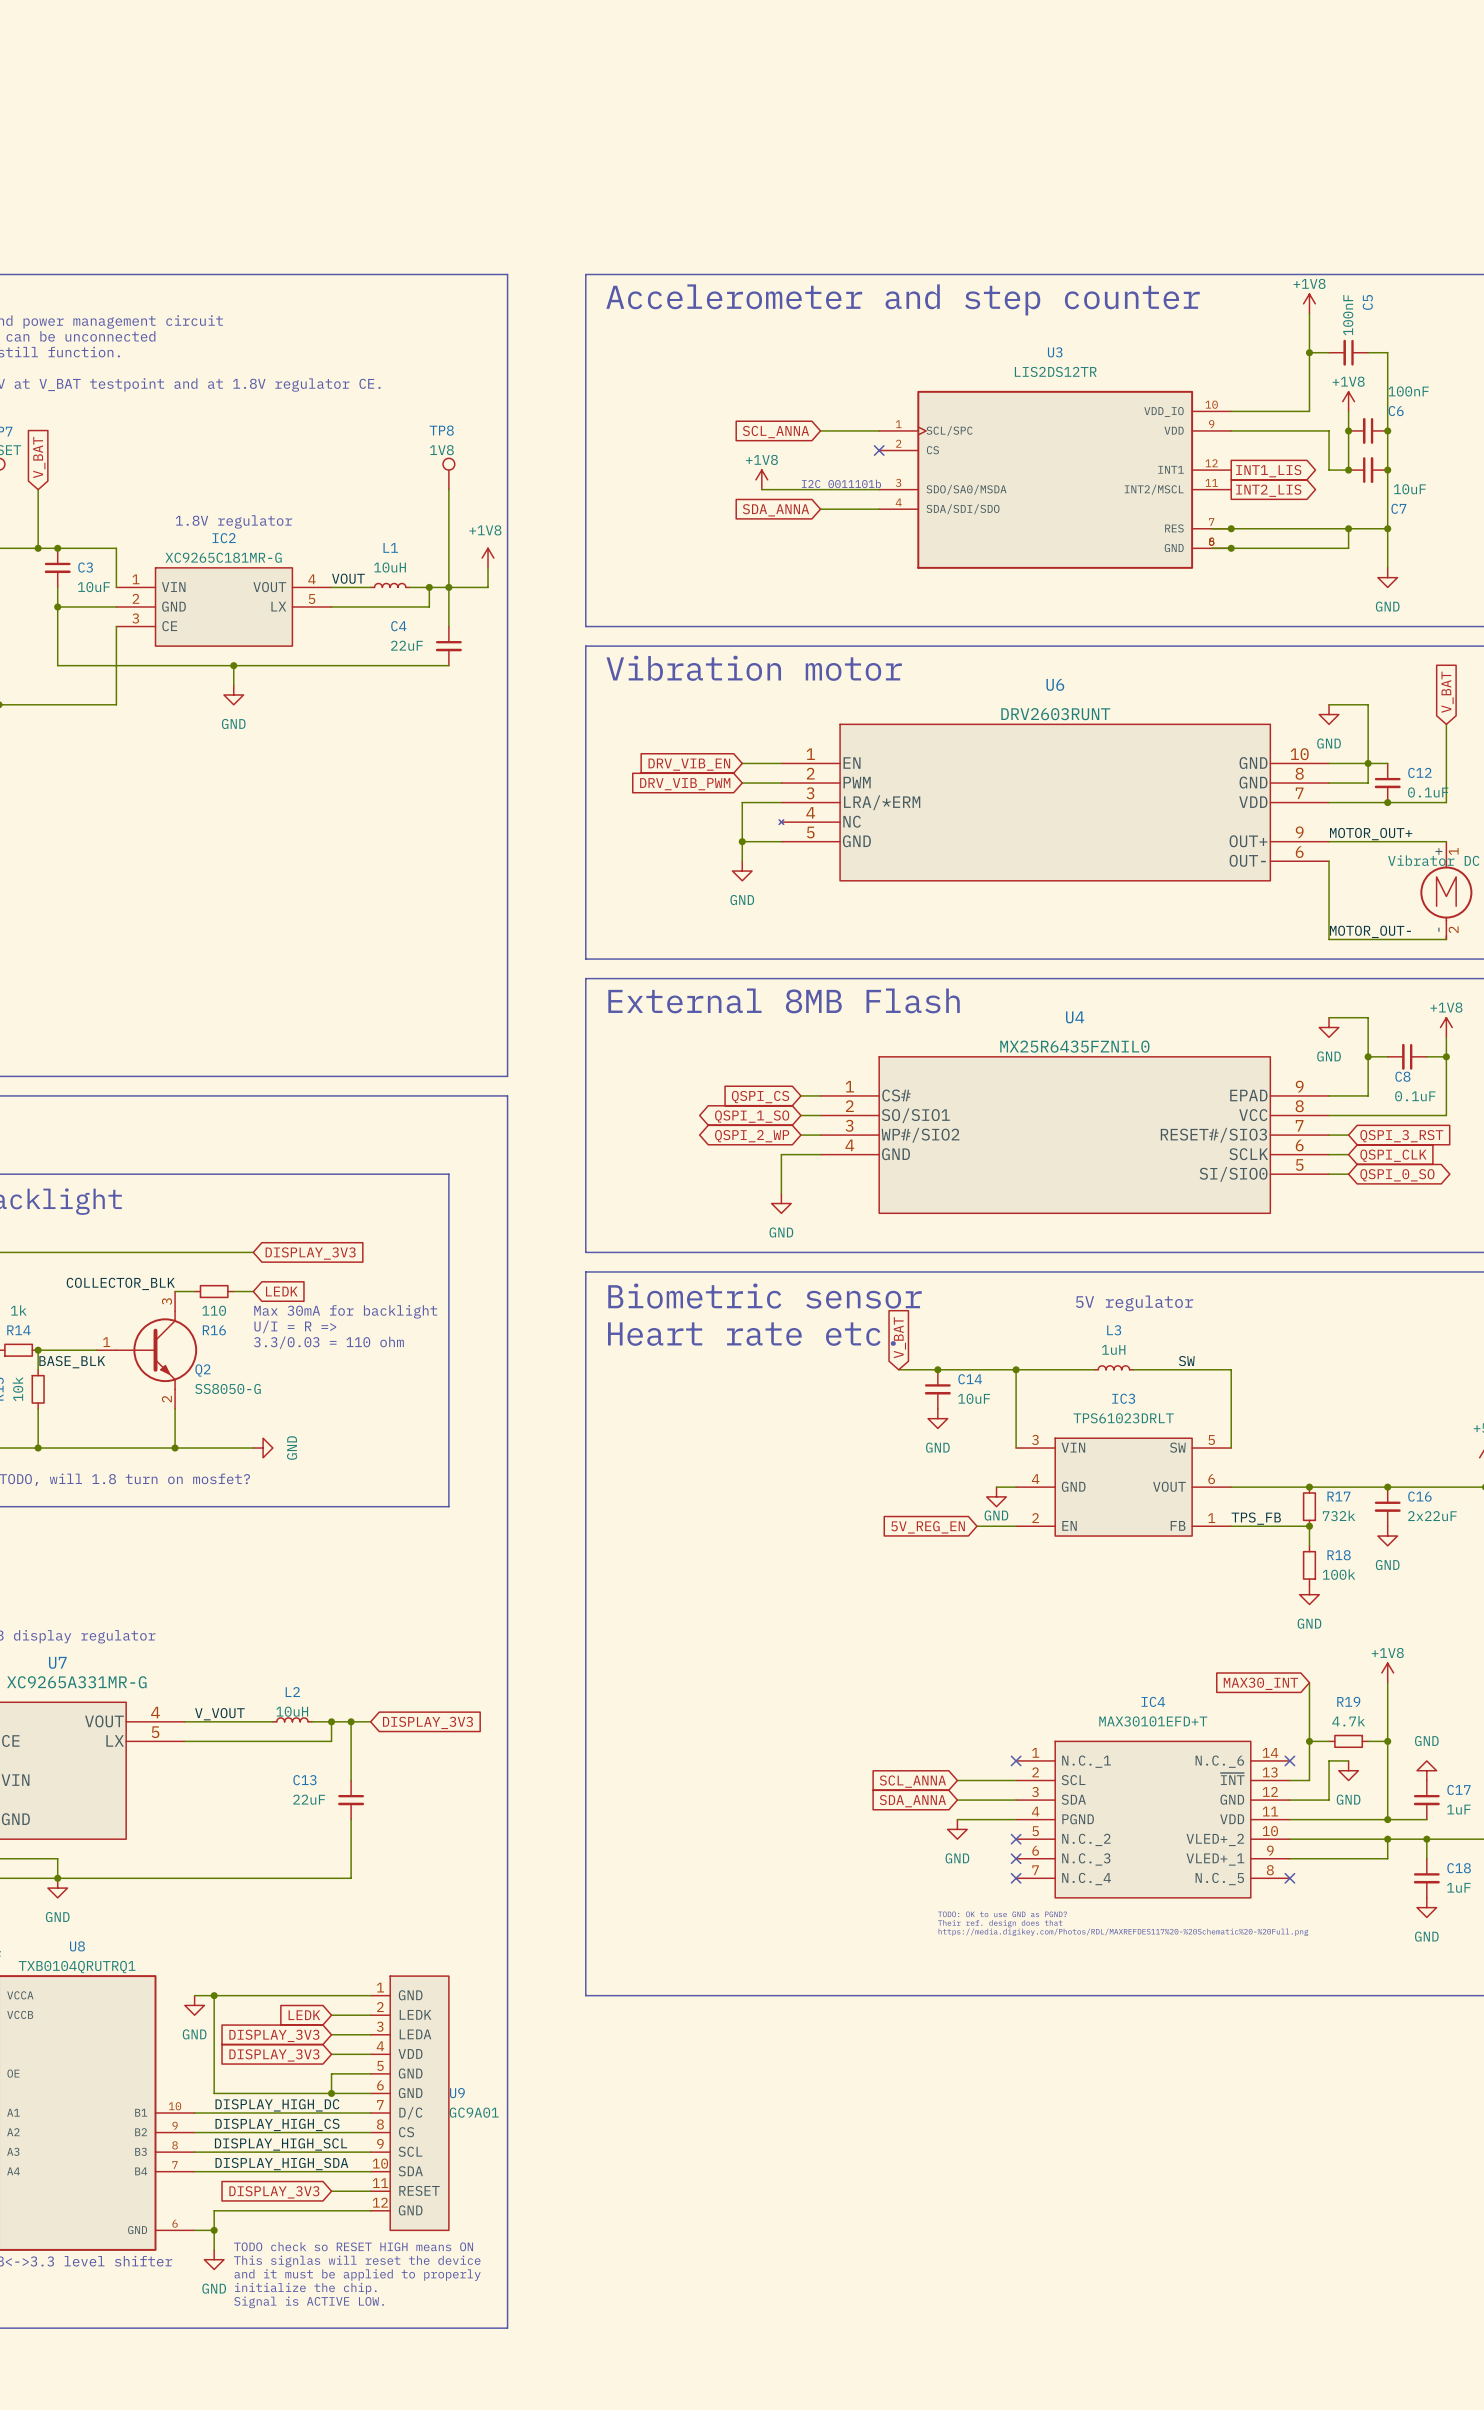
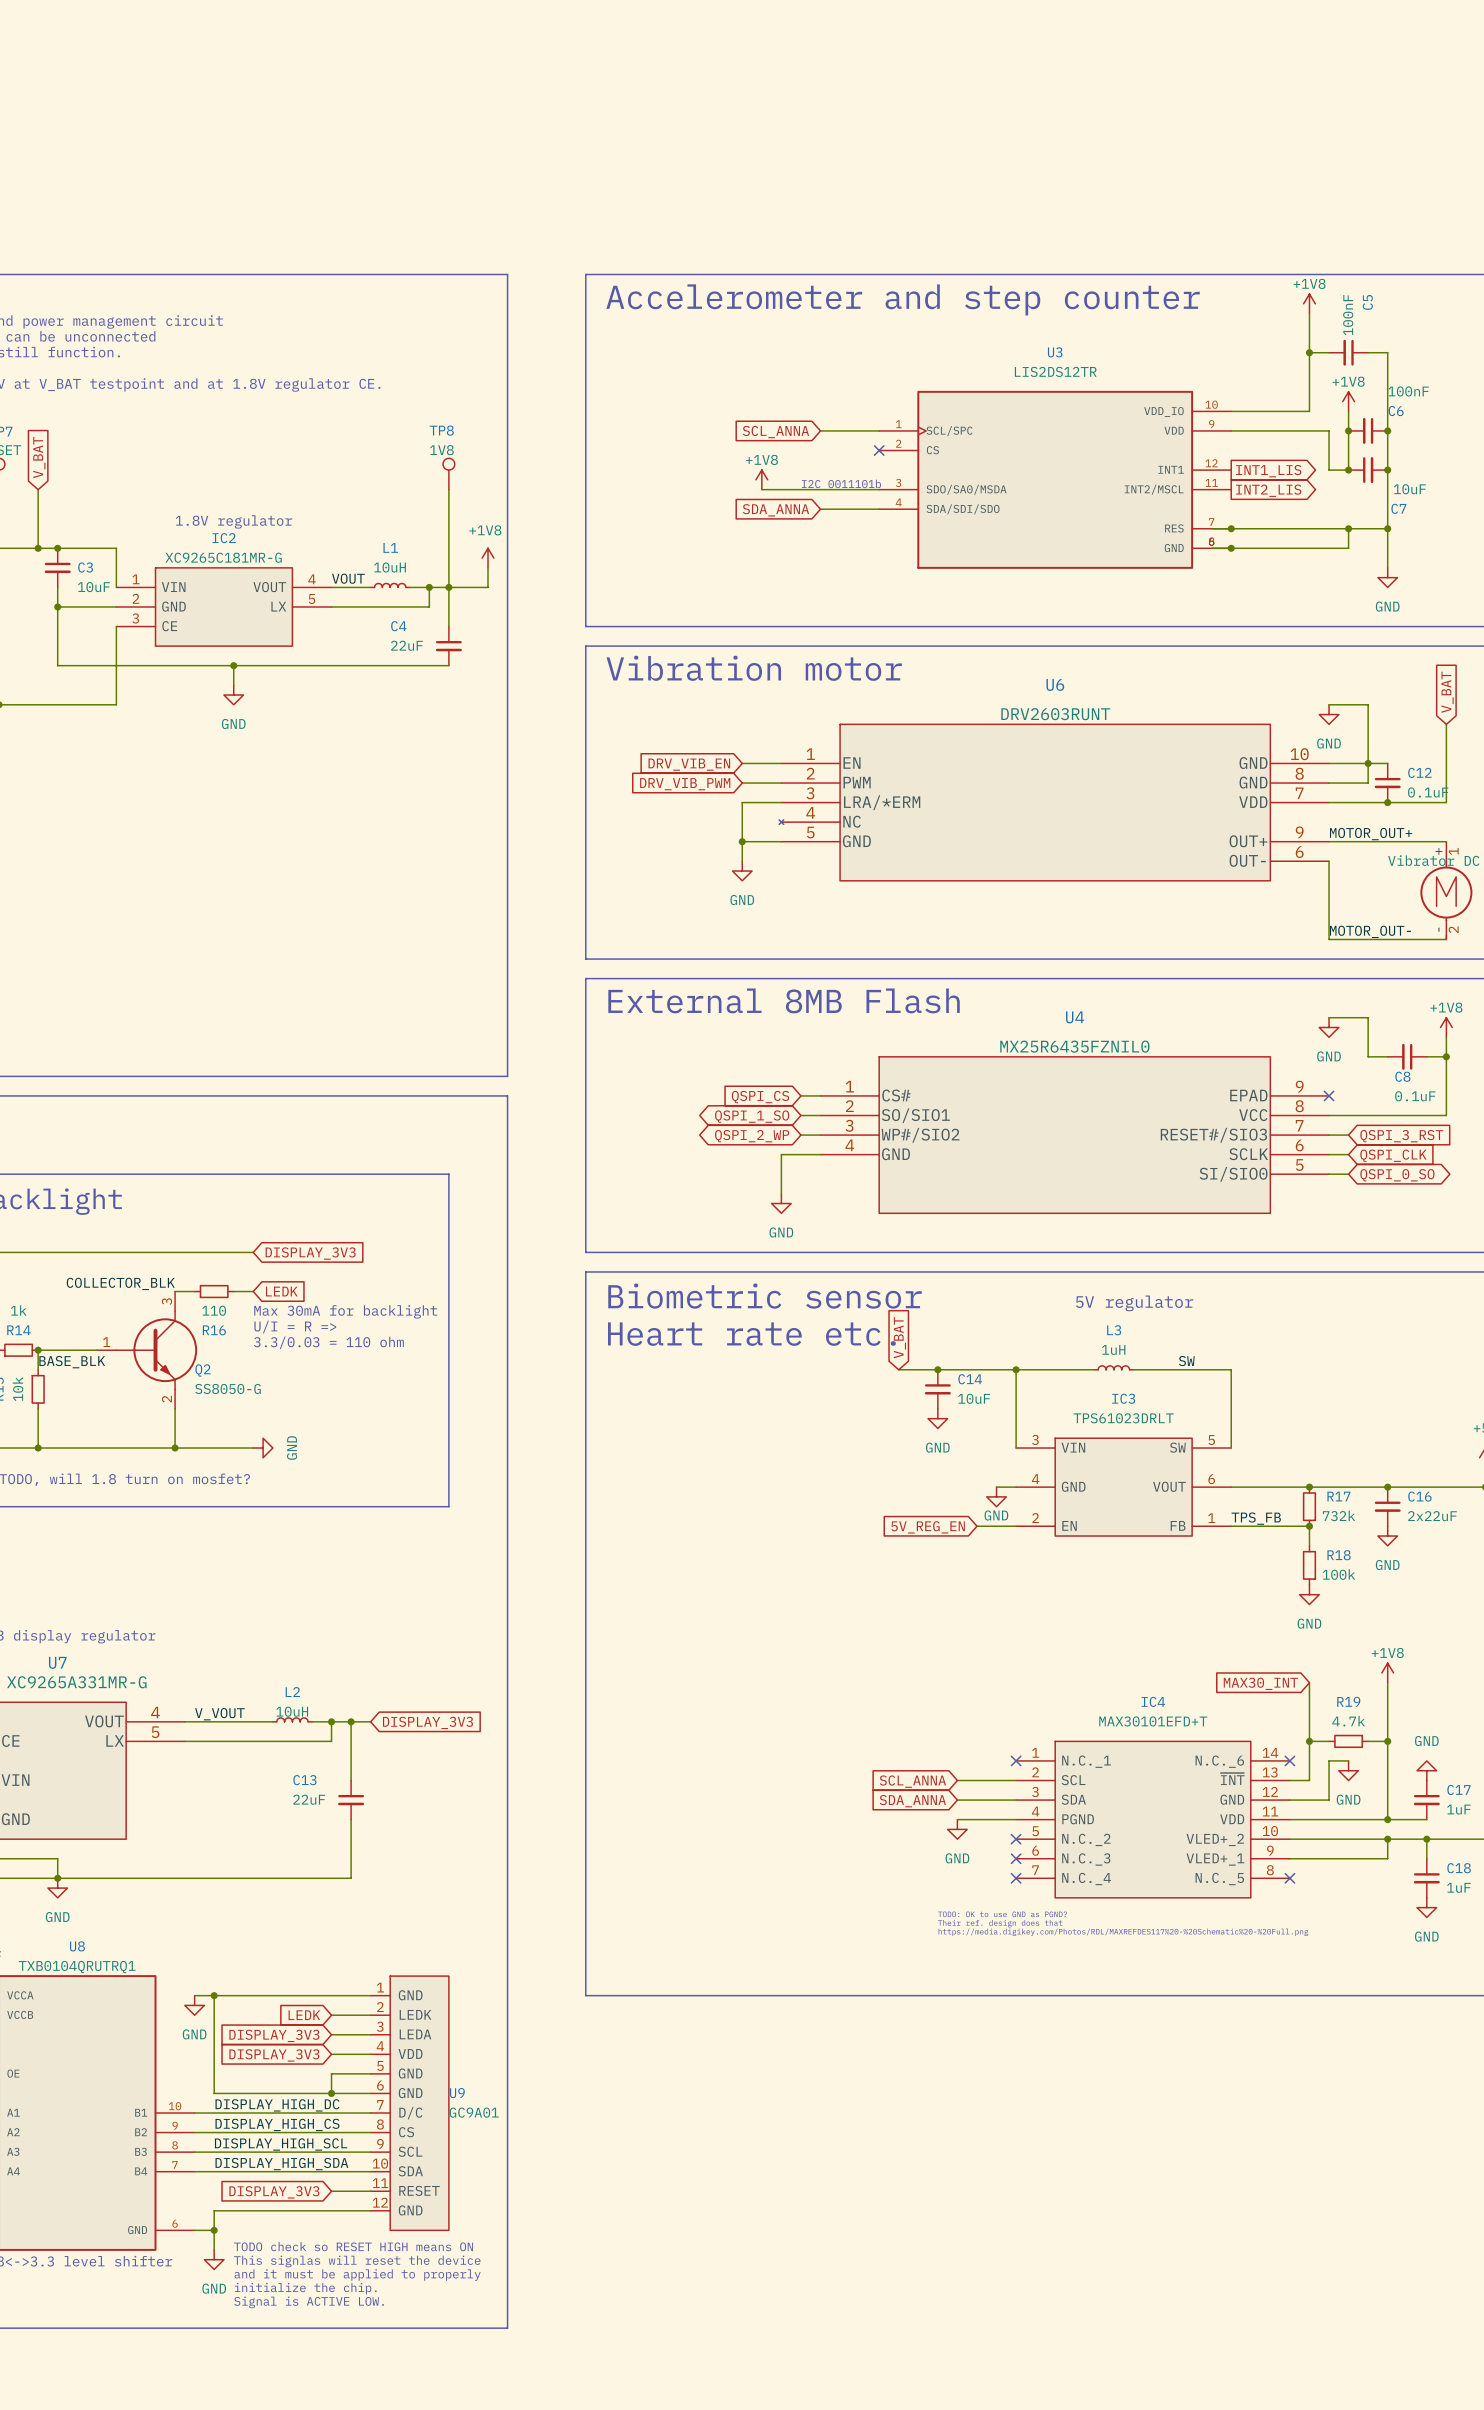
wire: (1368, 1056) (1368, 1095) (1329, 1095) -> none
junction: (1368, 1056) -> none
no-connect mark: none -> (1329, 1095)

